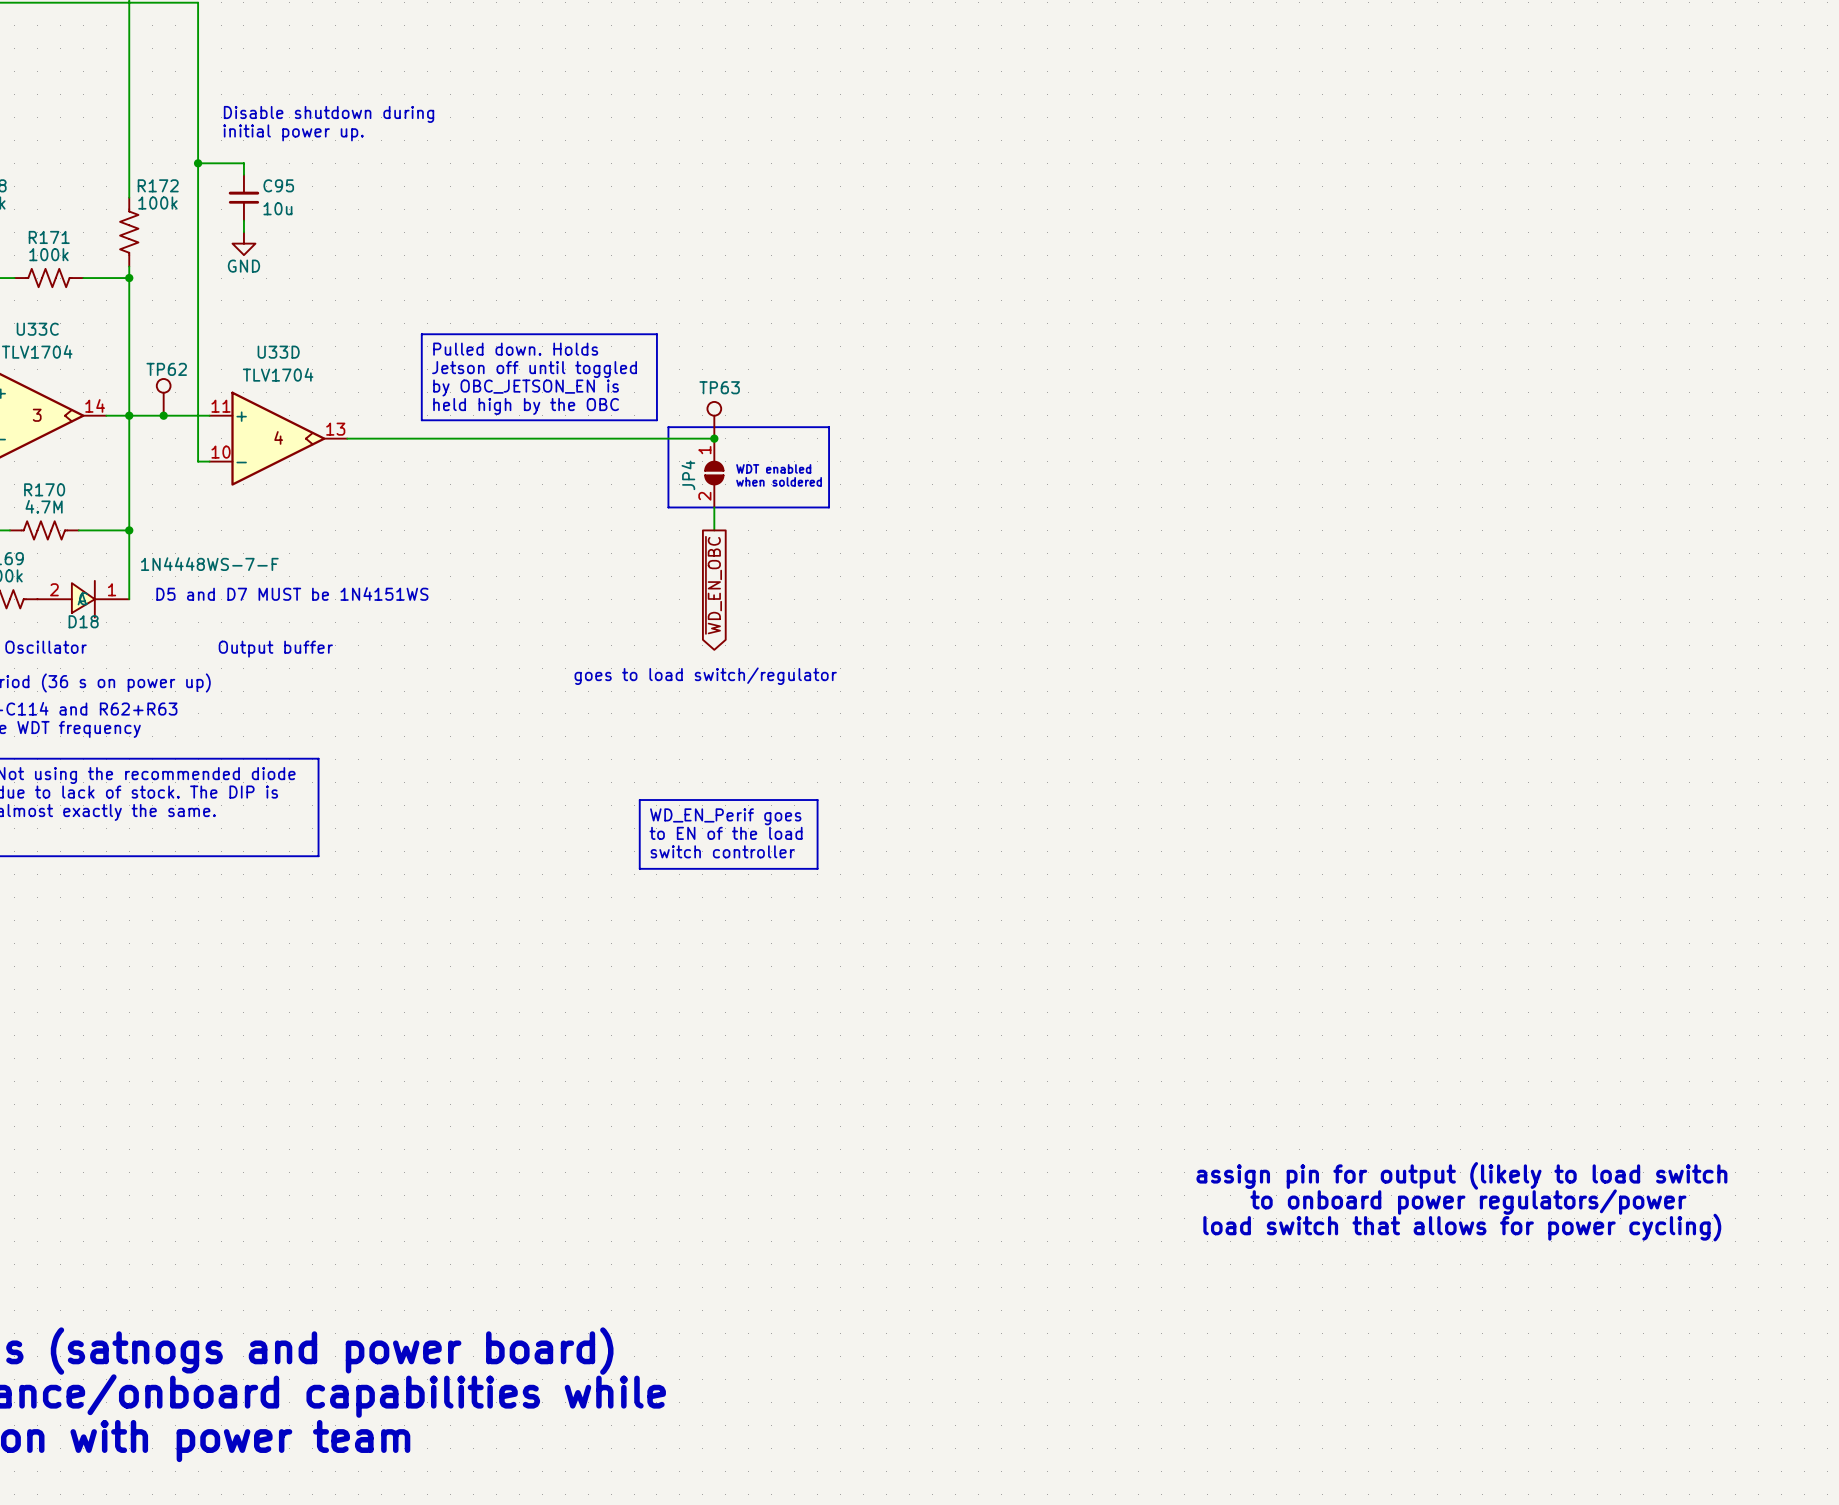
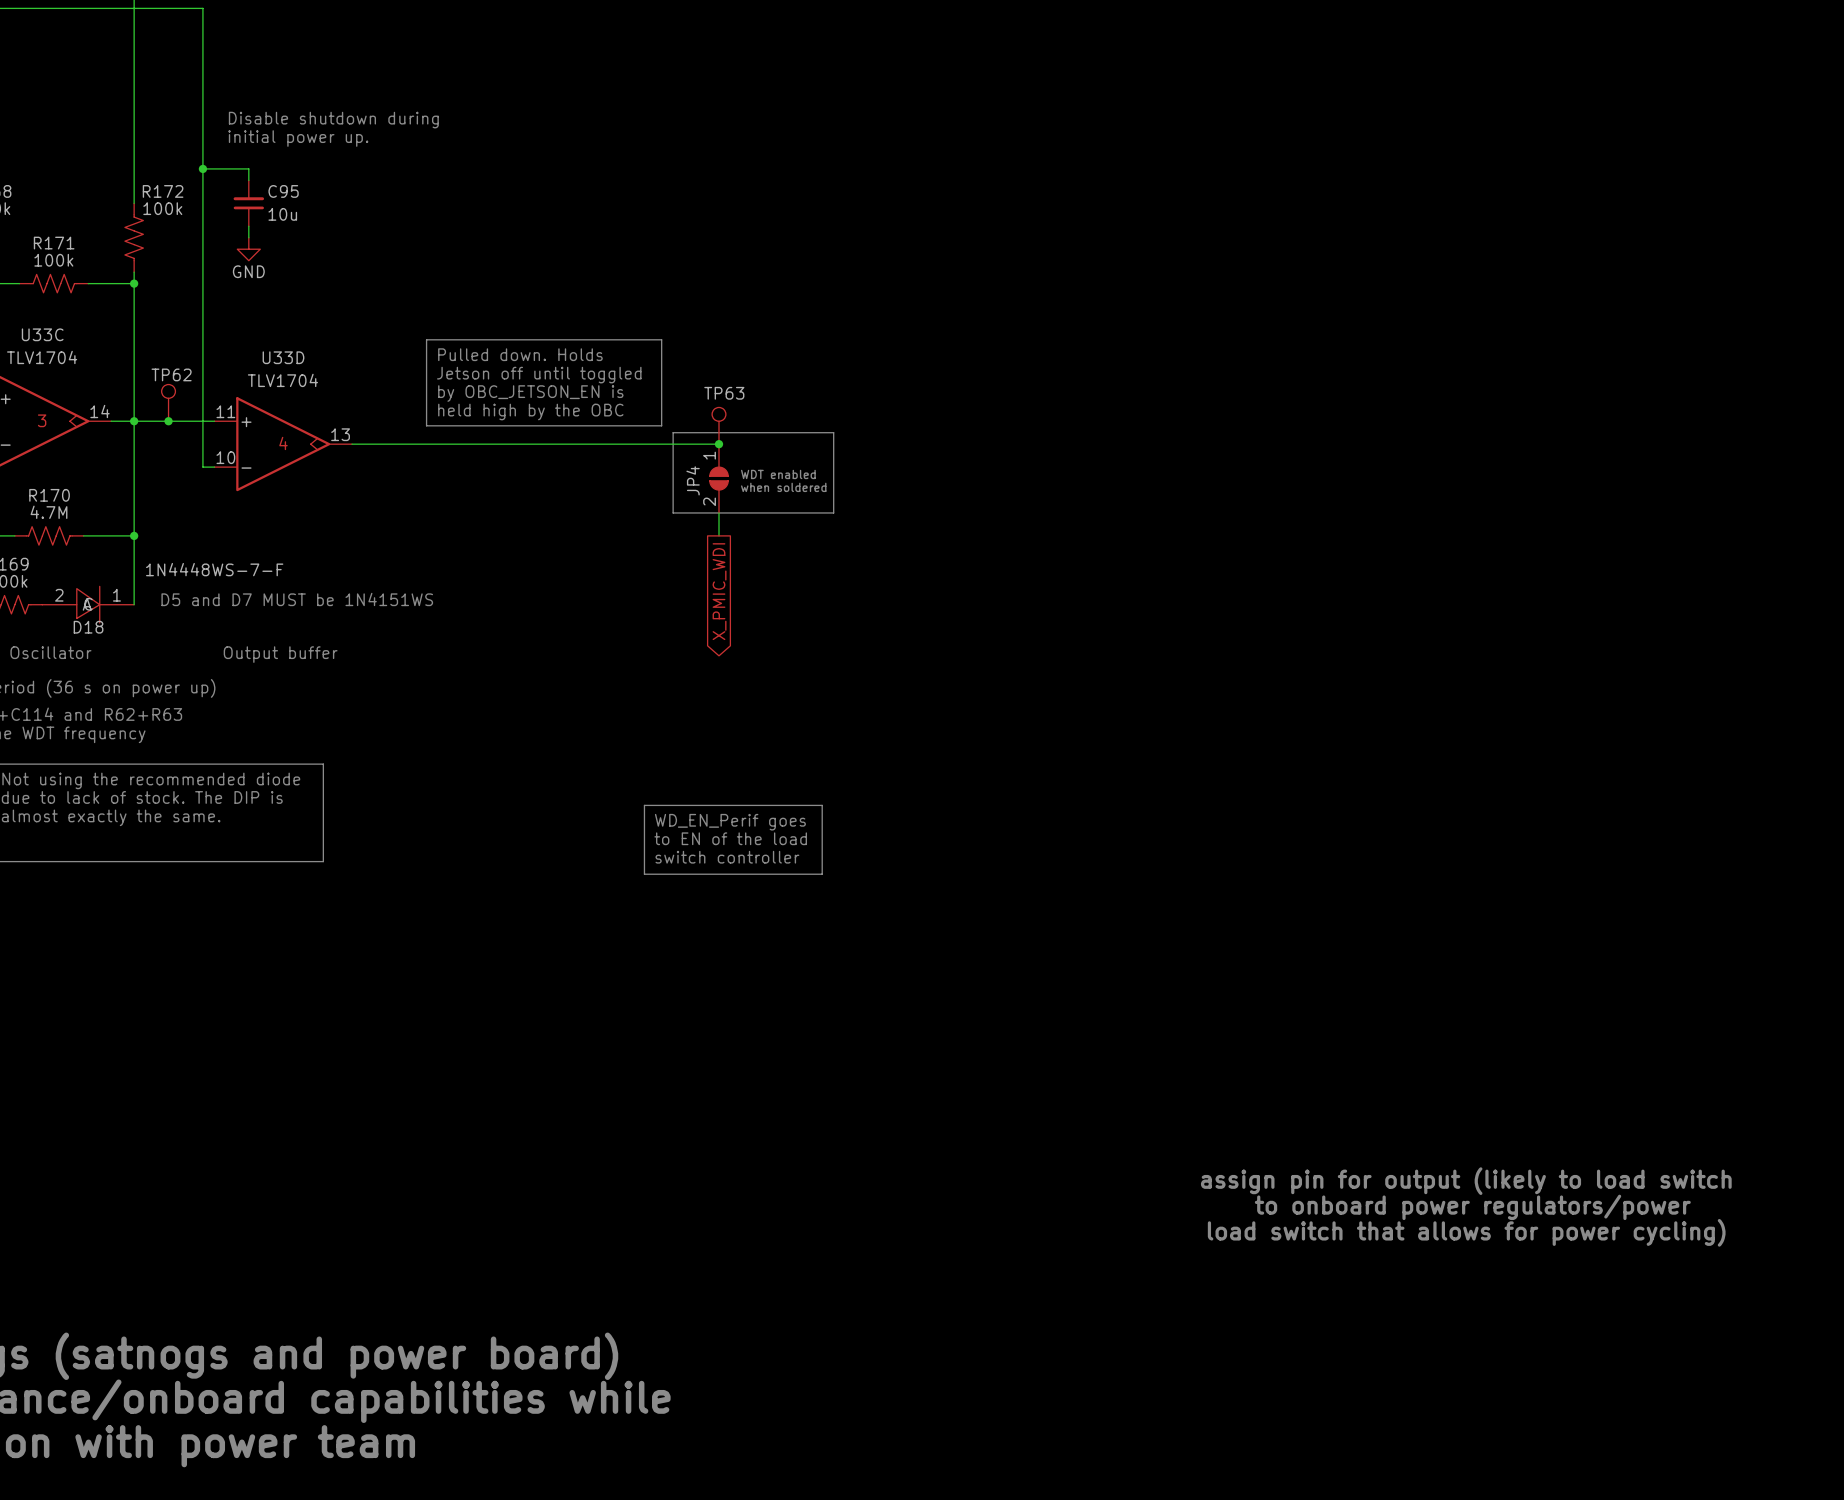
global label: ~{WD_EN_OBC} (713, 585) -> X_PMIC_WDI (719, 591)
text: goes to load switch/regulator (705, 676) -> none

